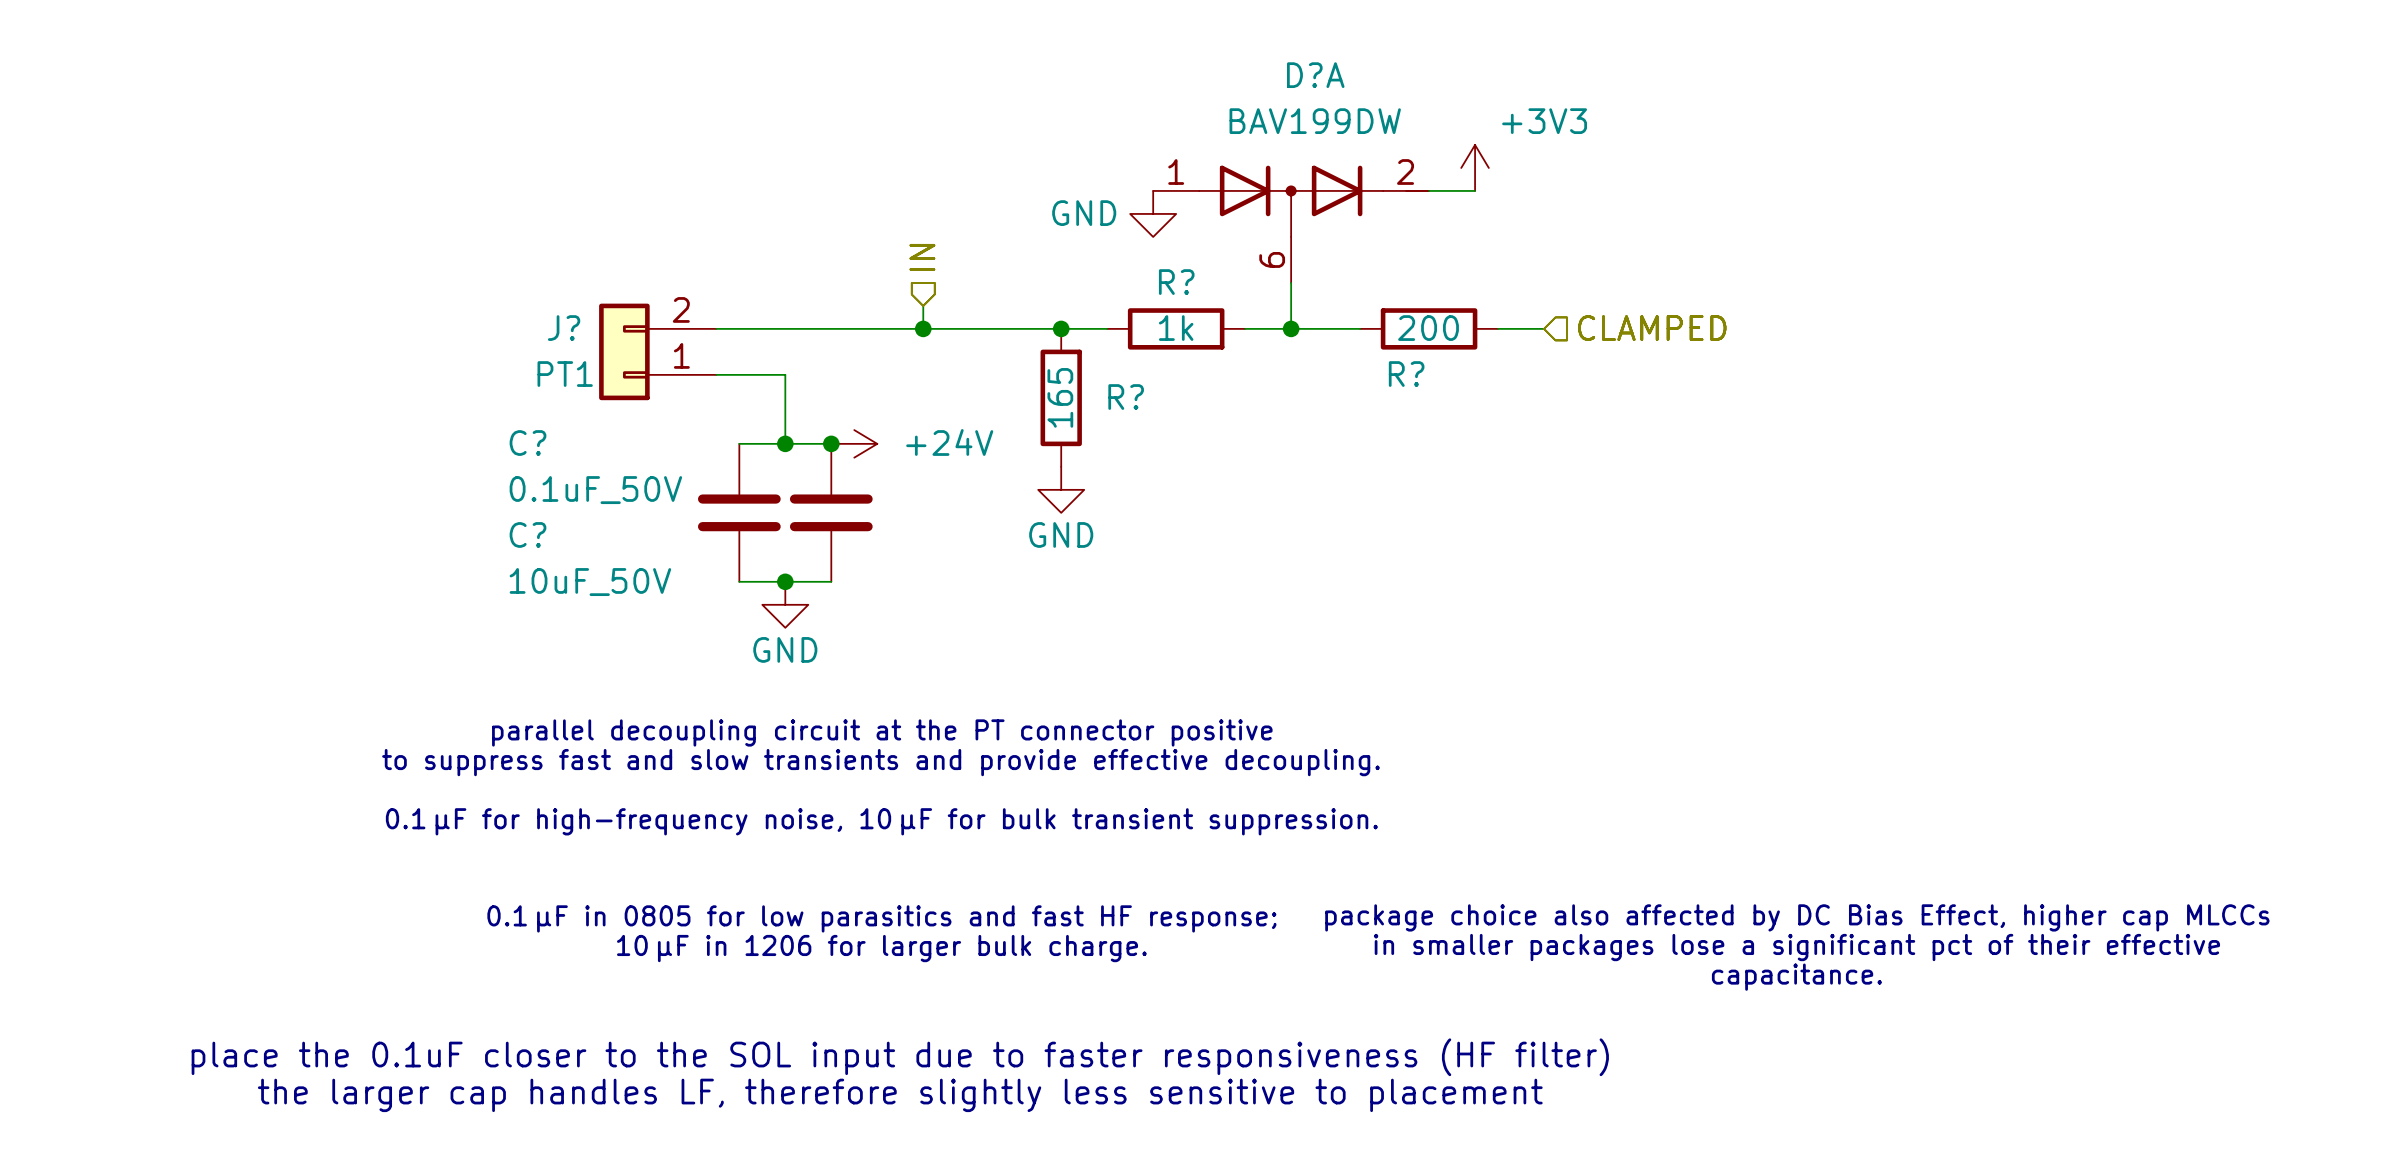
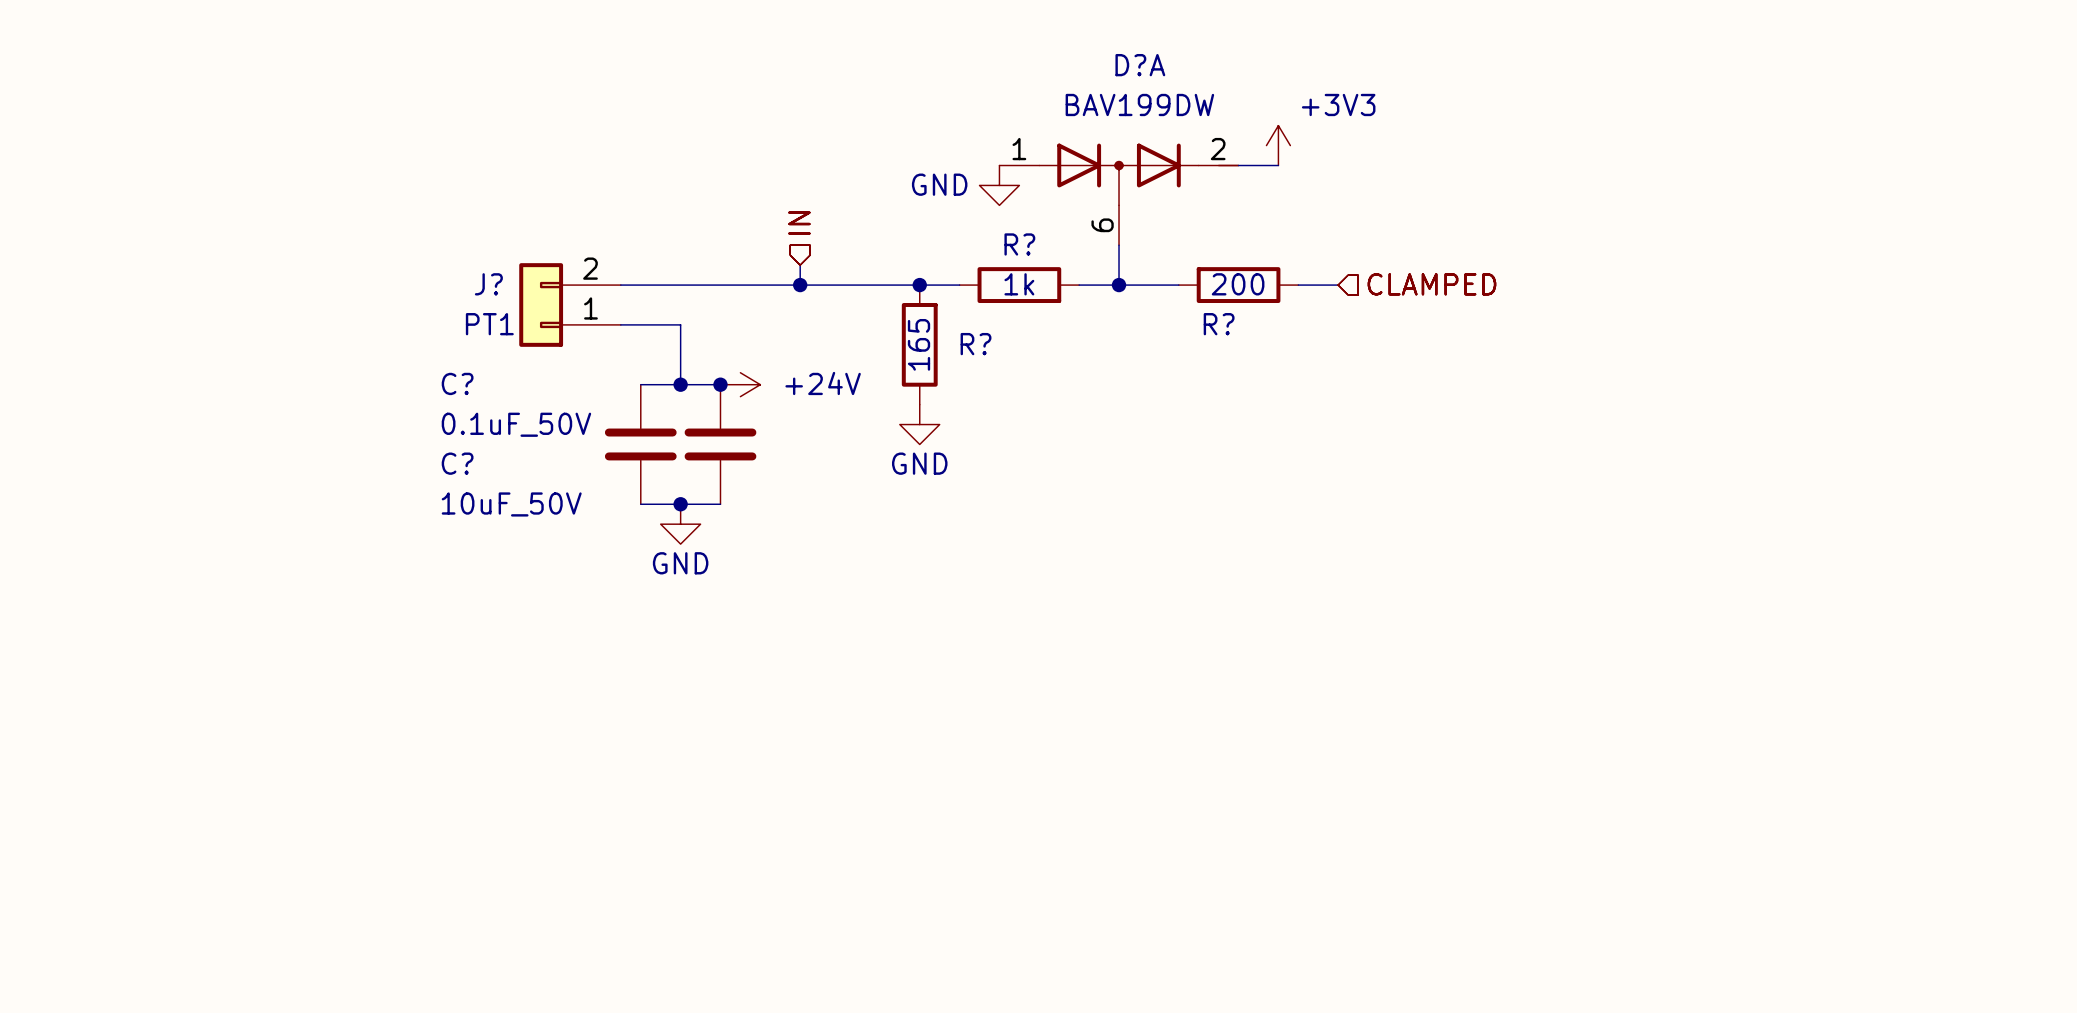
text: parallel decoupling circuit at the PT connector positive (882, 732) -> none
text: to suppress fast and slow transients and provide effective decoupling. (881, 762) -> none
text: 0.1 µF for high-frequency noise, 10 µF for bulk transient suppression. (881, 821) -> none
text: package choice also affected by DC Bias Effect, higher cap MLCCs (1797, 917) -> none
text: 0.1 µF in 0805 for low parasitics and fast HF response; (881, 918) -> none
text: in smaller packages lose a significant pct of their effective (1796, 947) -> none
text: 10 µF in 1206 for larger bulk charge. (881, 948) -> none
text: capacitance. (1796, 977) -> none
text: place the 0.1uF closer to the SOL input due to faster responsiveness (HF filter) (900, 1057) -> none
text: the larger cap handles LF, therefore slightly less sensitive to placement (900, 1095) -> none

